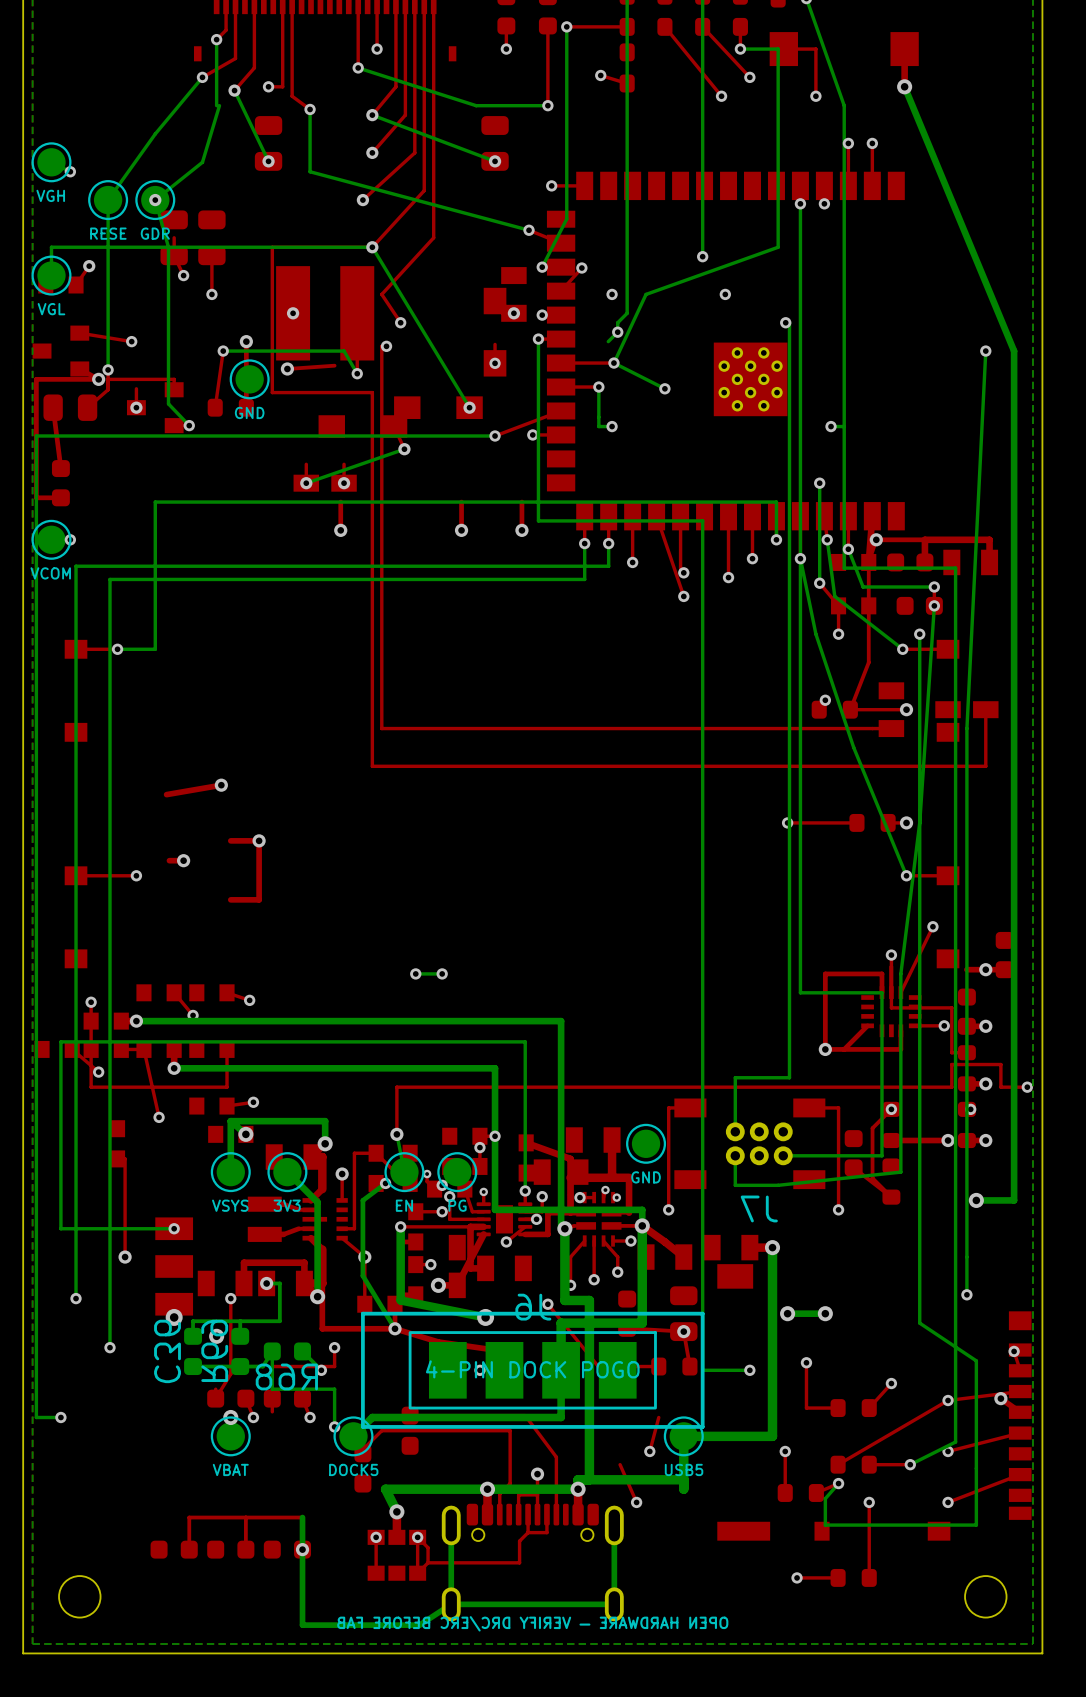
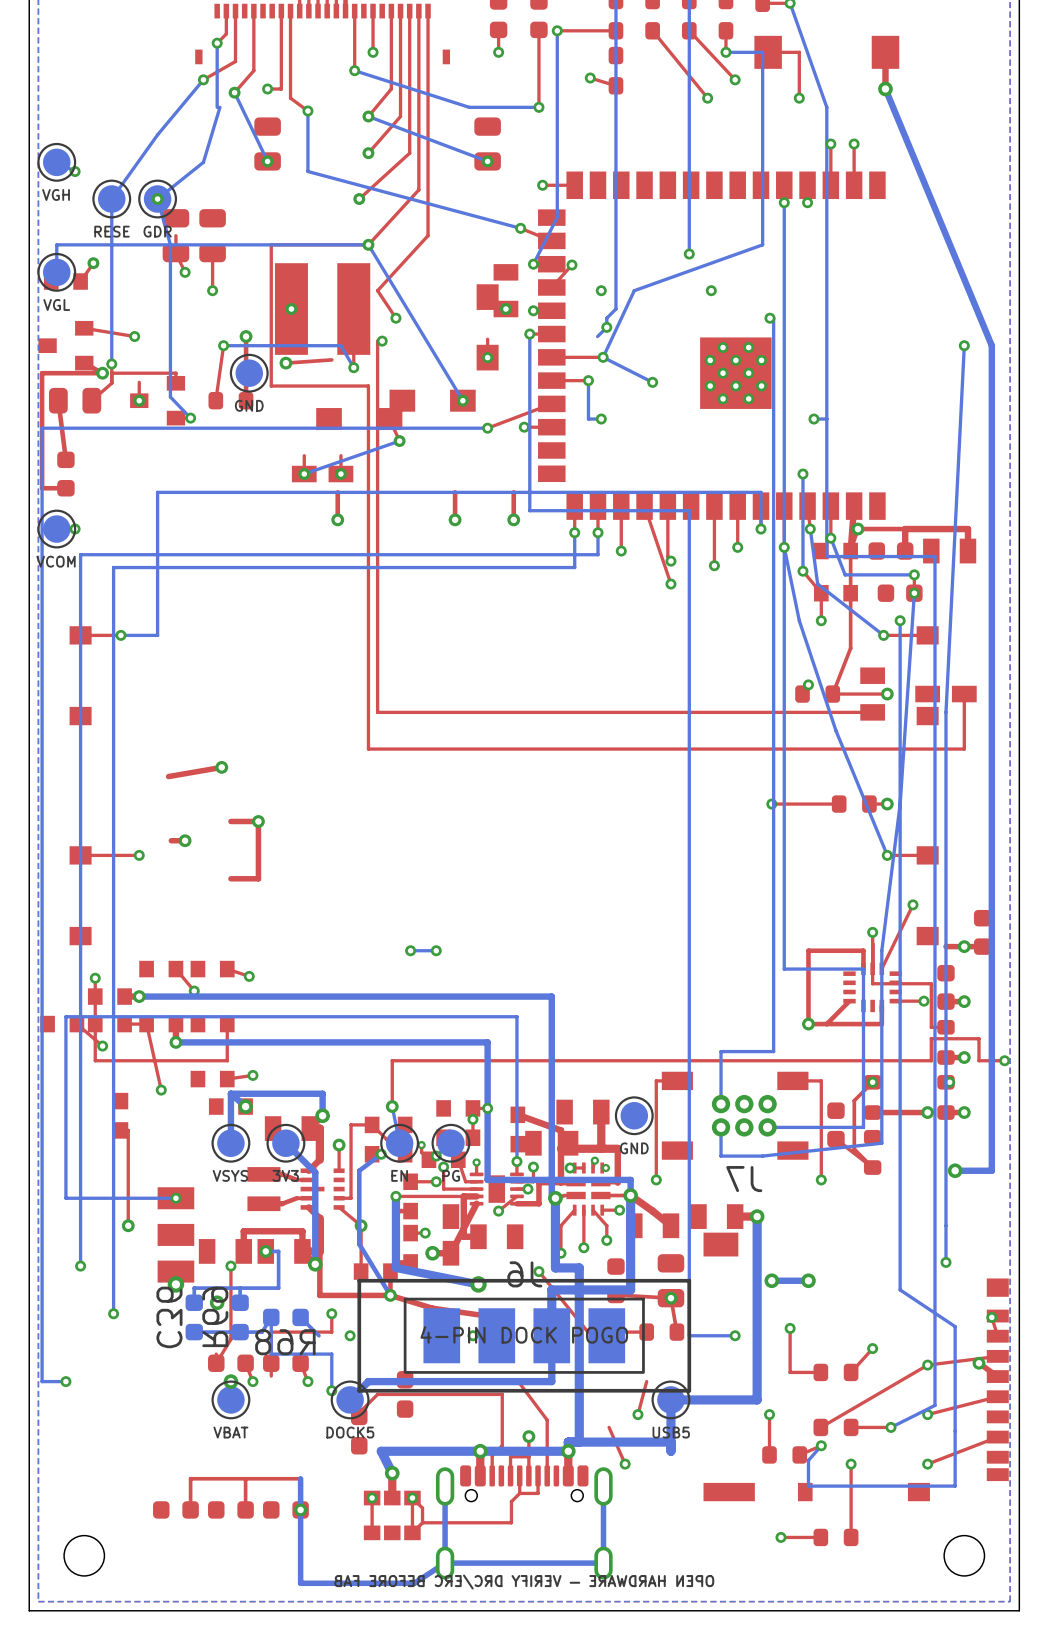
via position: (321, 1370) -> (350, 1335)

